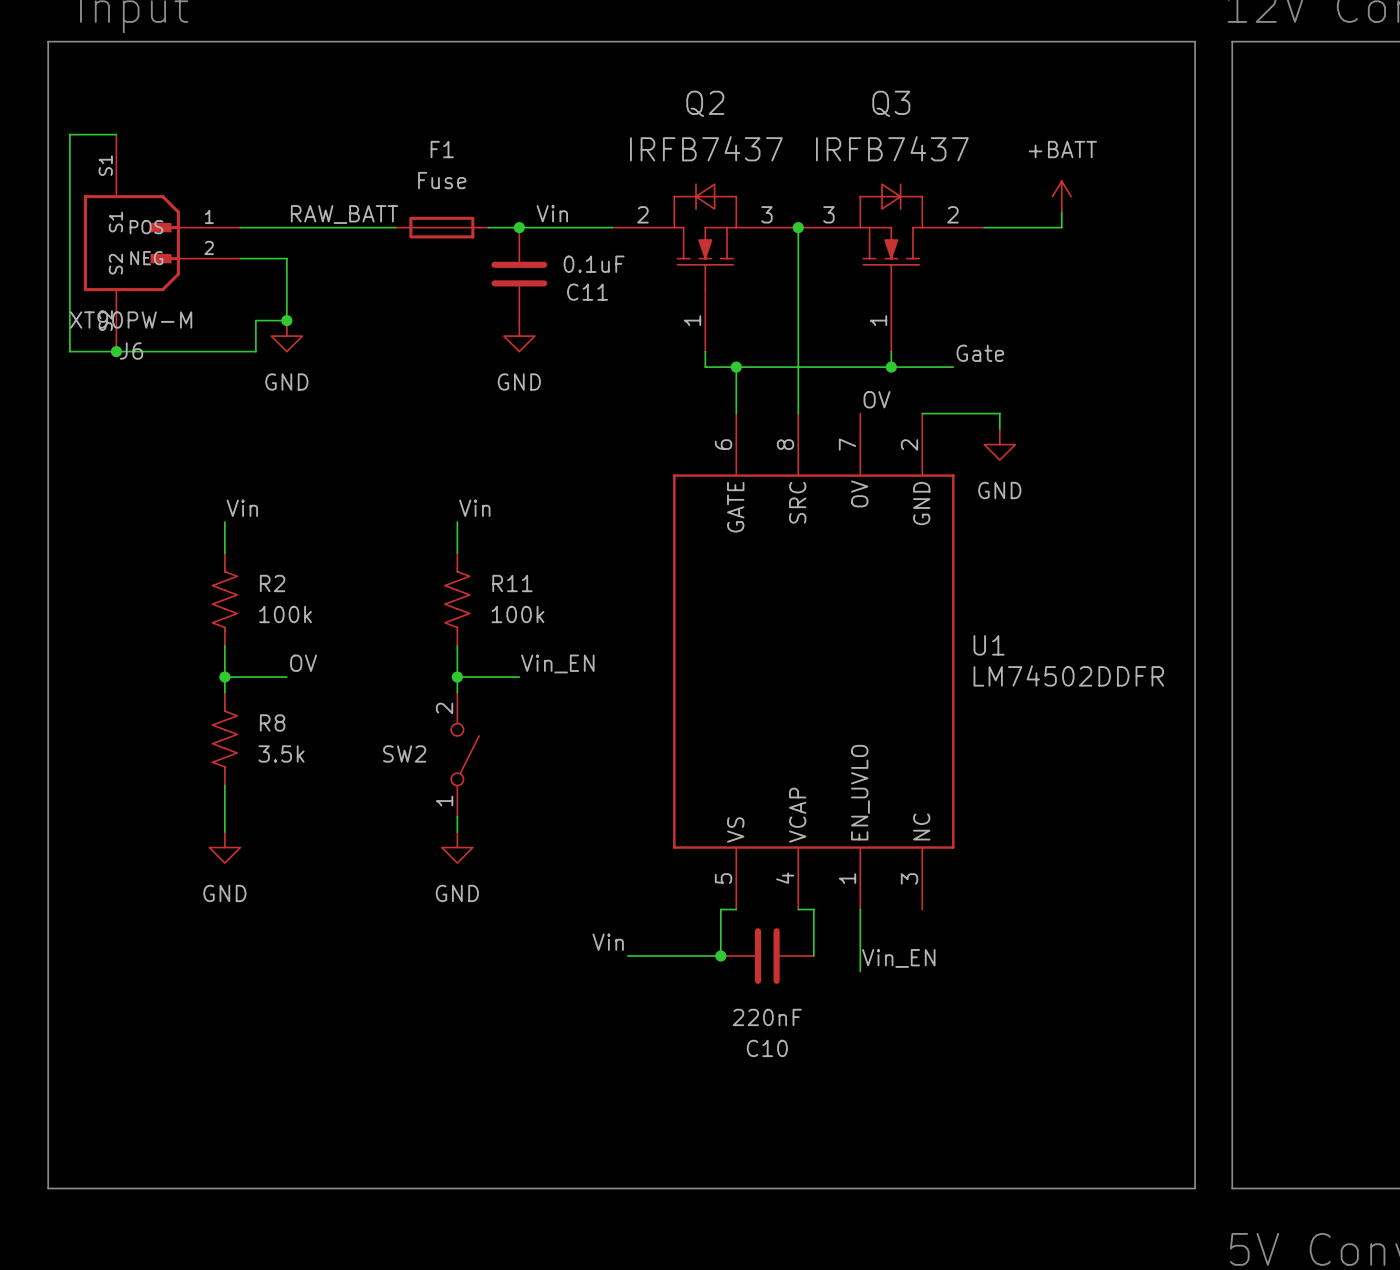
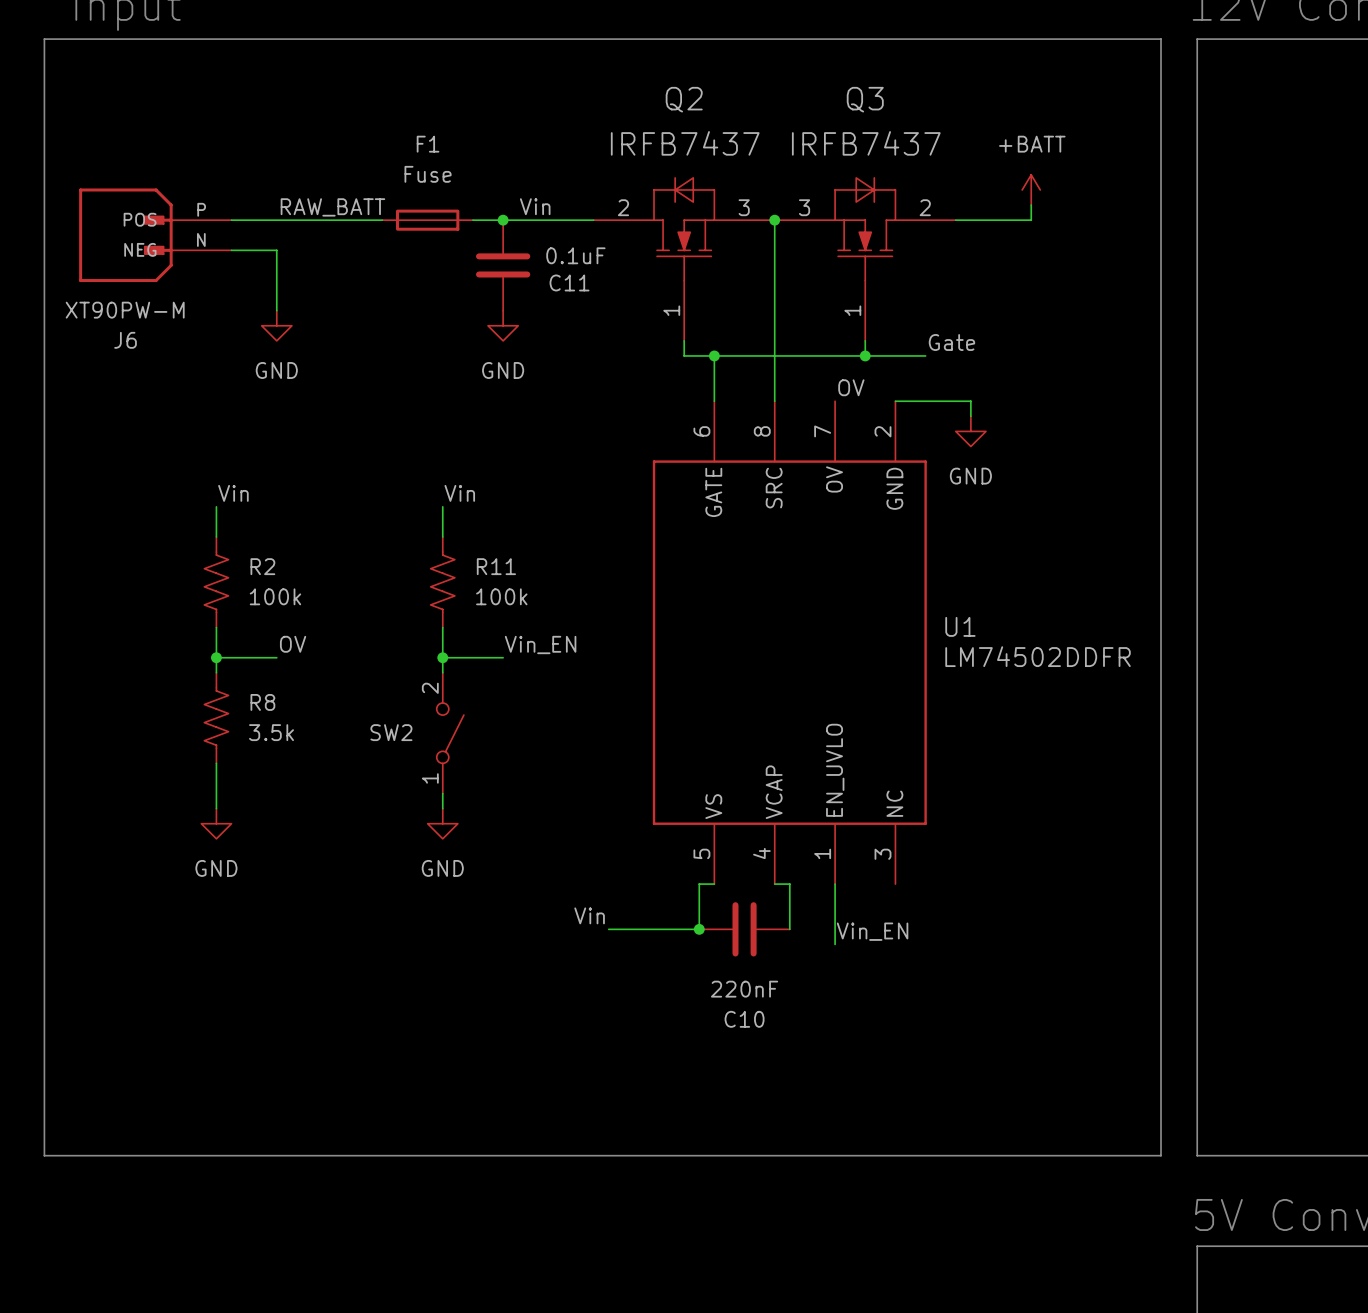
J6 symbol: [83, 134, 241, 352] -> [79, 188, 232, 283]
wire: (116, 134) (69, 134) (69, 351) (255, 351) (255, 320) (286, 320) -> none
junction: (286, 320) -> none
junction: (116, 351) -> none

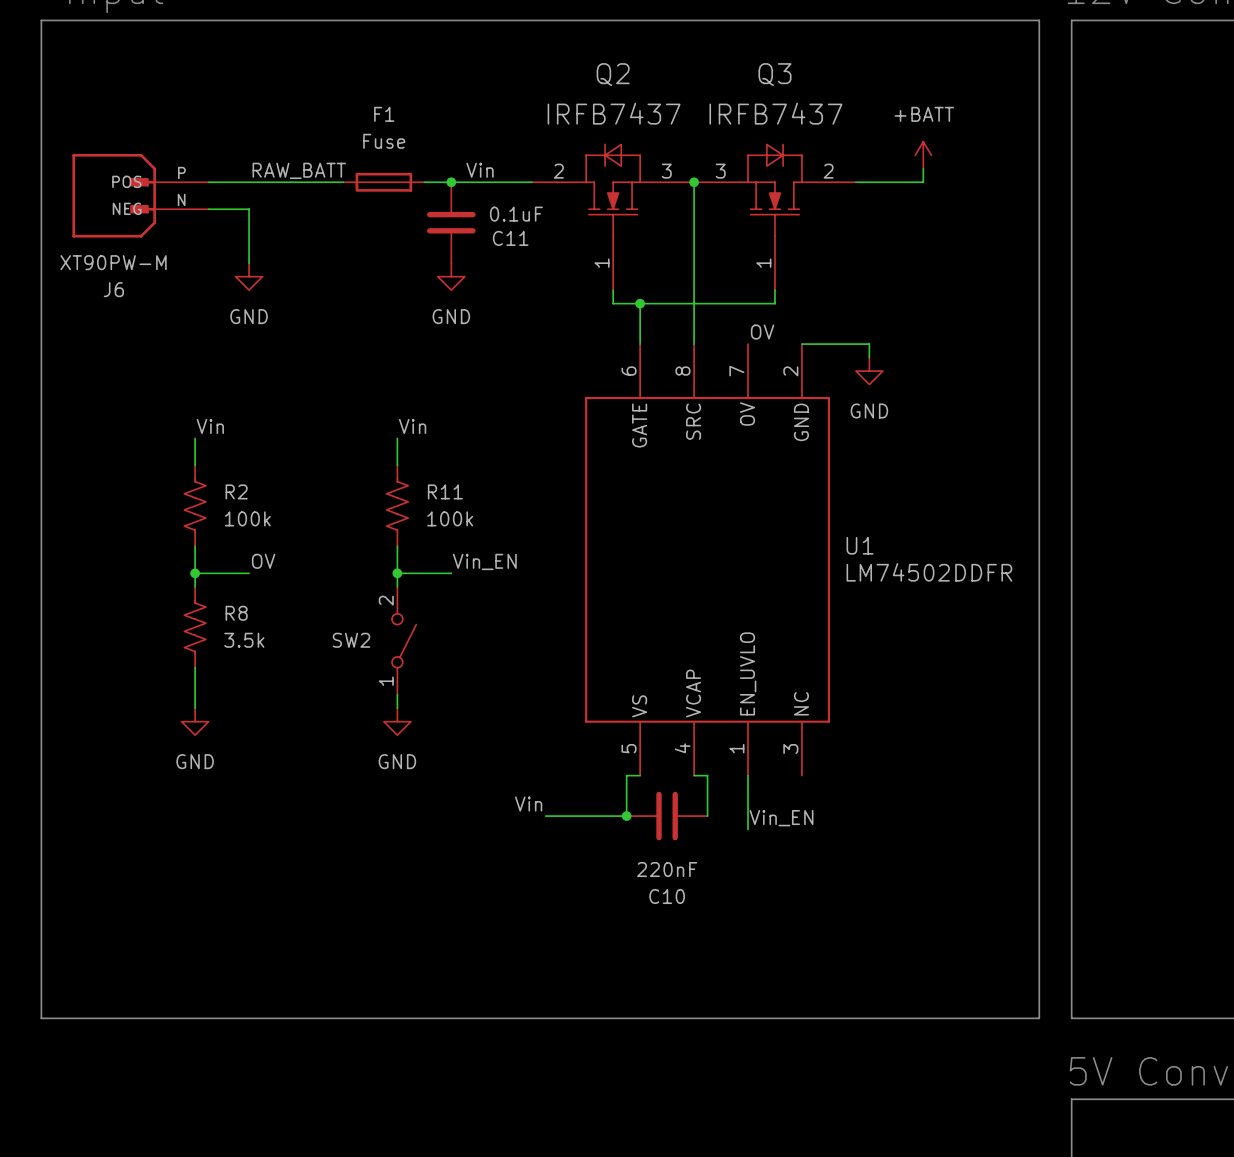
label: Gate (951, 342) -> none
wire: (865, 355) (925, 355) -> none
junction: (865, 355) -> none

